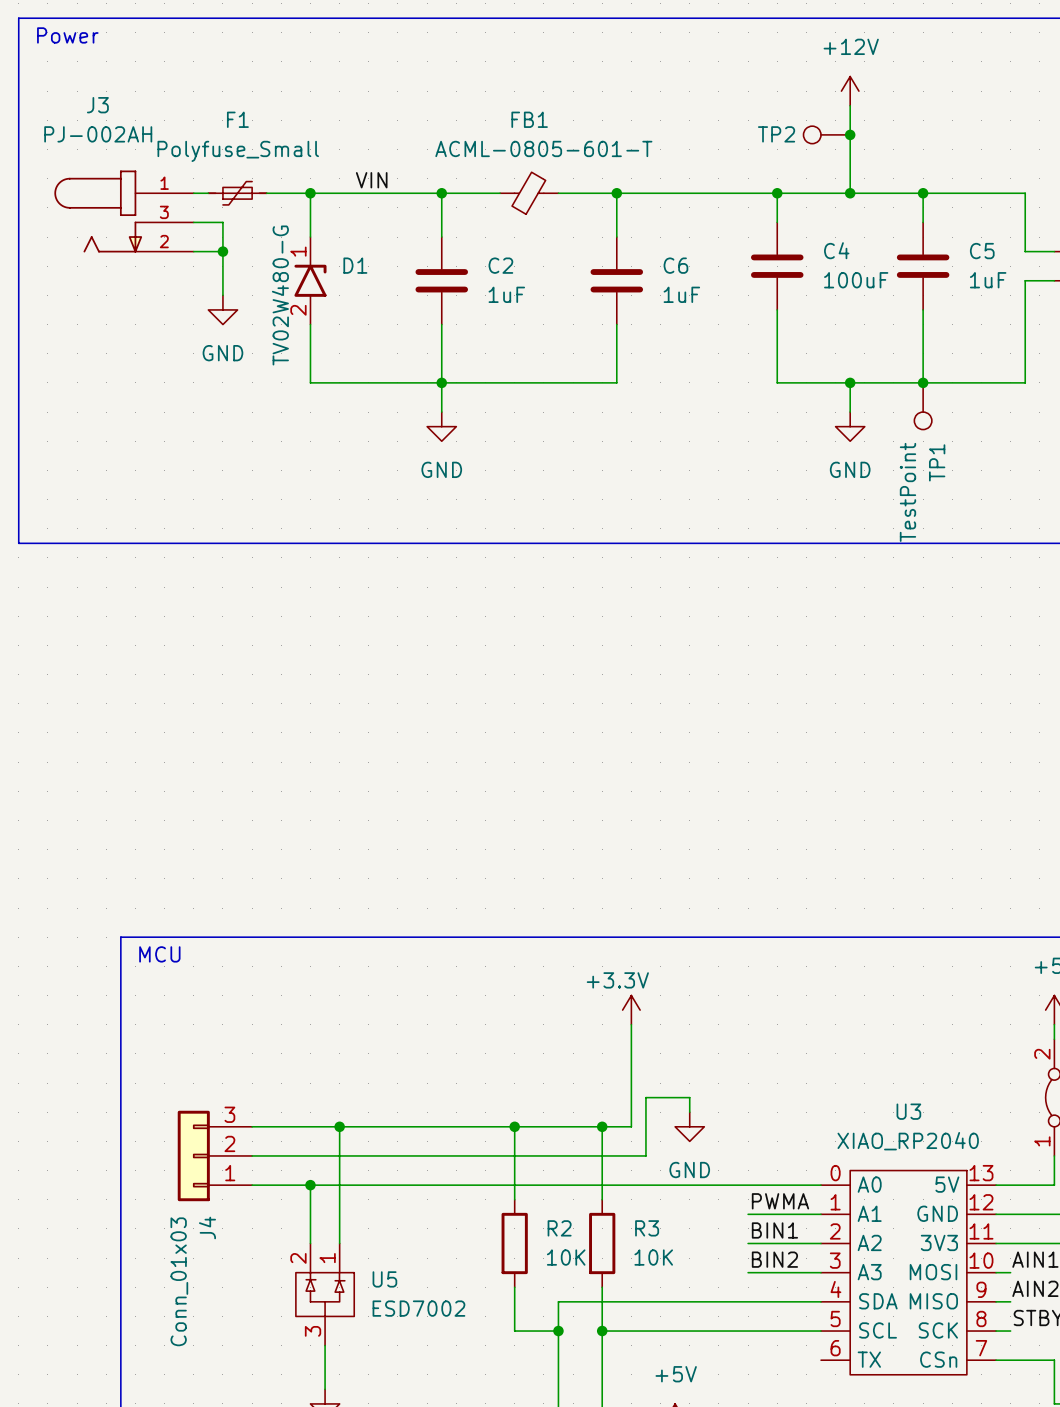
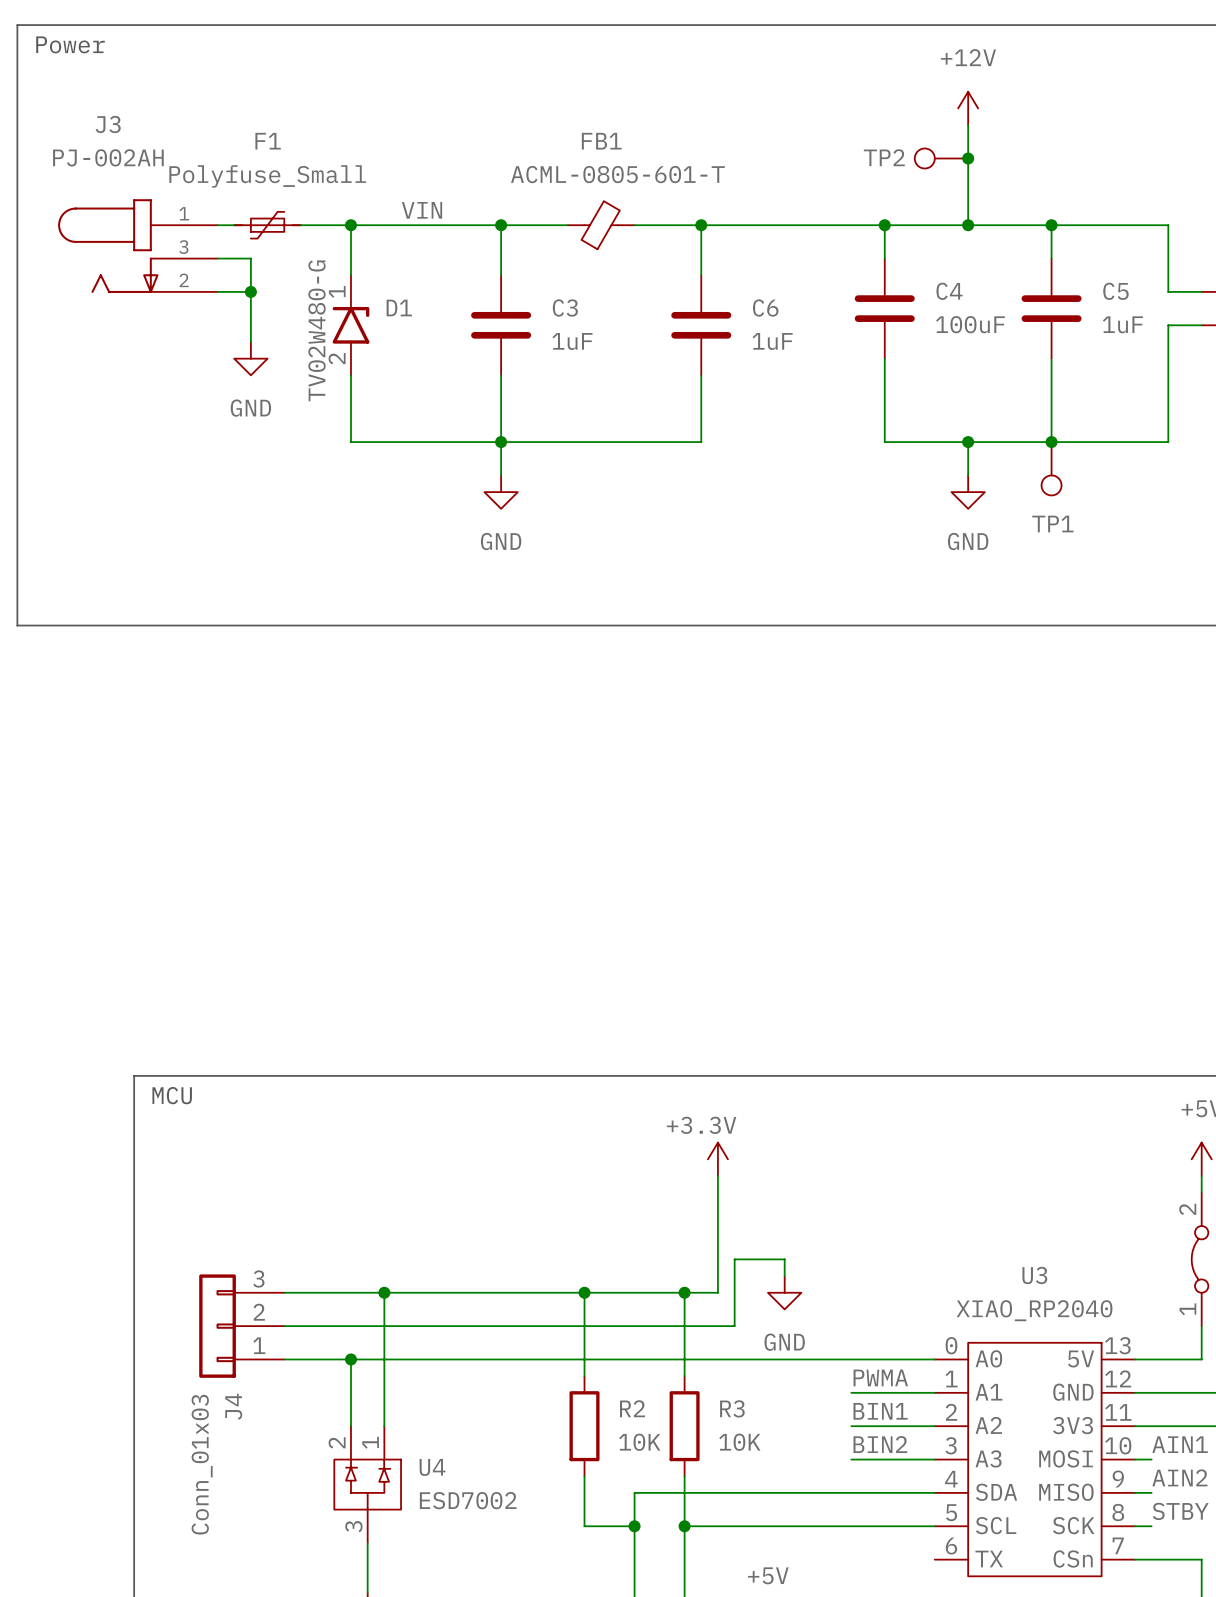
C2 name: C2 (500, 265) -> C3 (565, 307)
TP1 name rotation: 0° (937, 462) -> 90° clockwise (1052, 524)
TP1 value: TestPoint (907, 492) -> none
U5 name: U5 (384, 1279) -> U4 (432, 1467)

